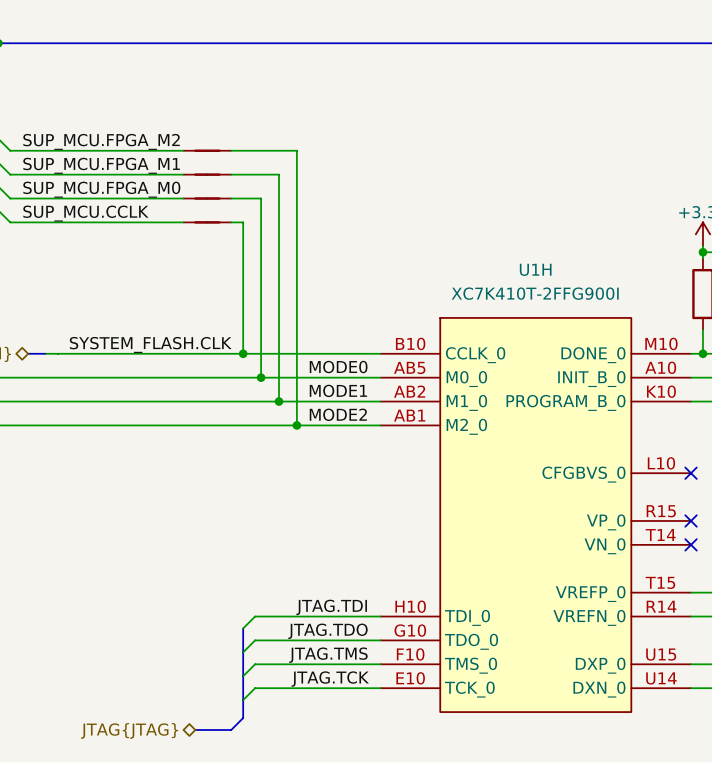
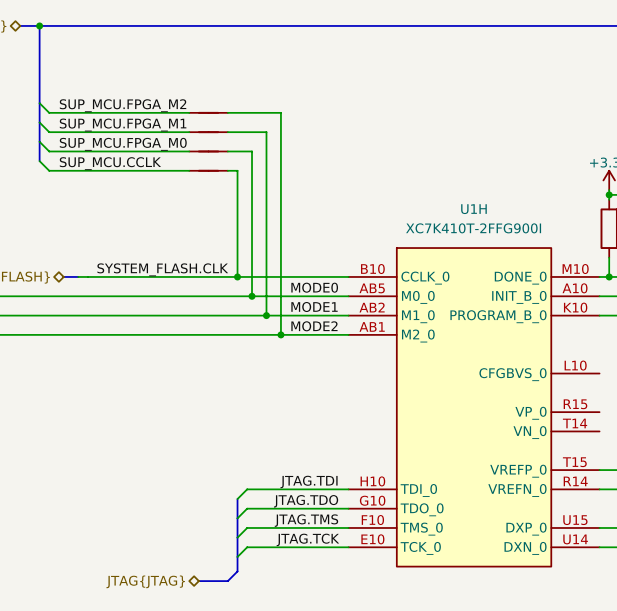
no-connect mark: (691, 473) -> none
no-connect mark: (691, 520) -> none
no-connect mark: (691, 544) -> none

